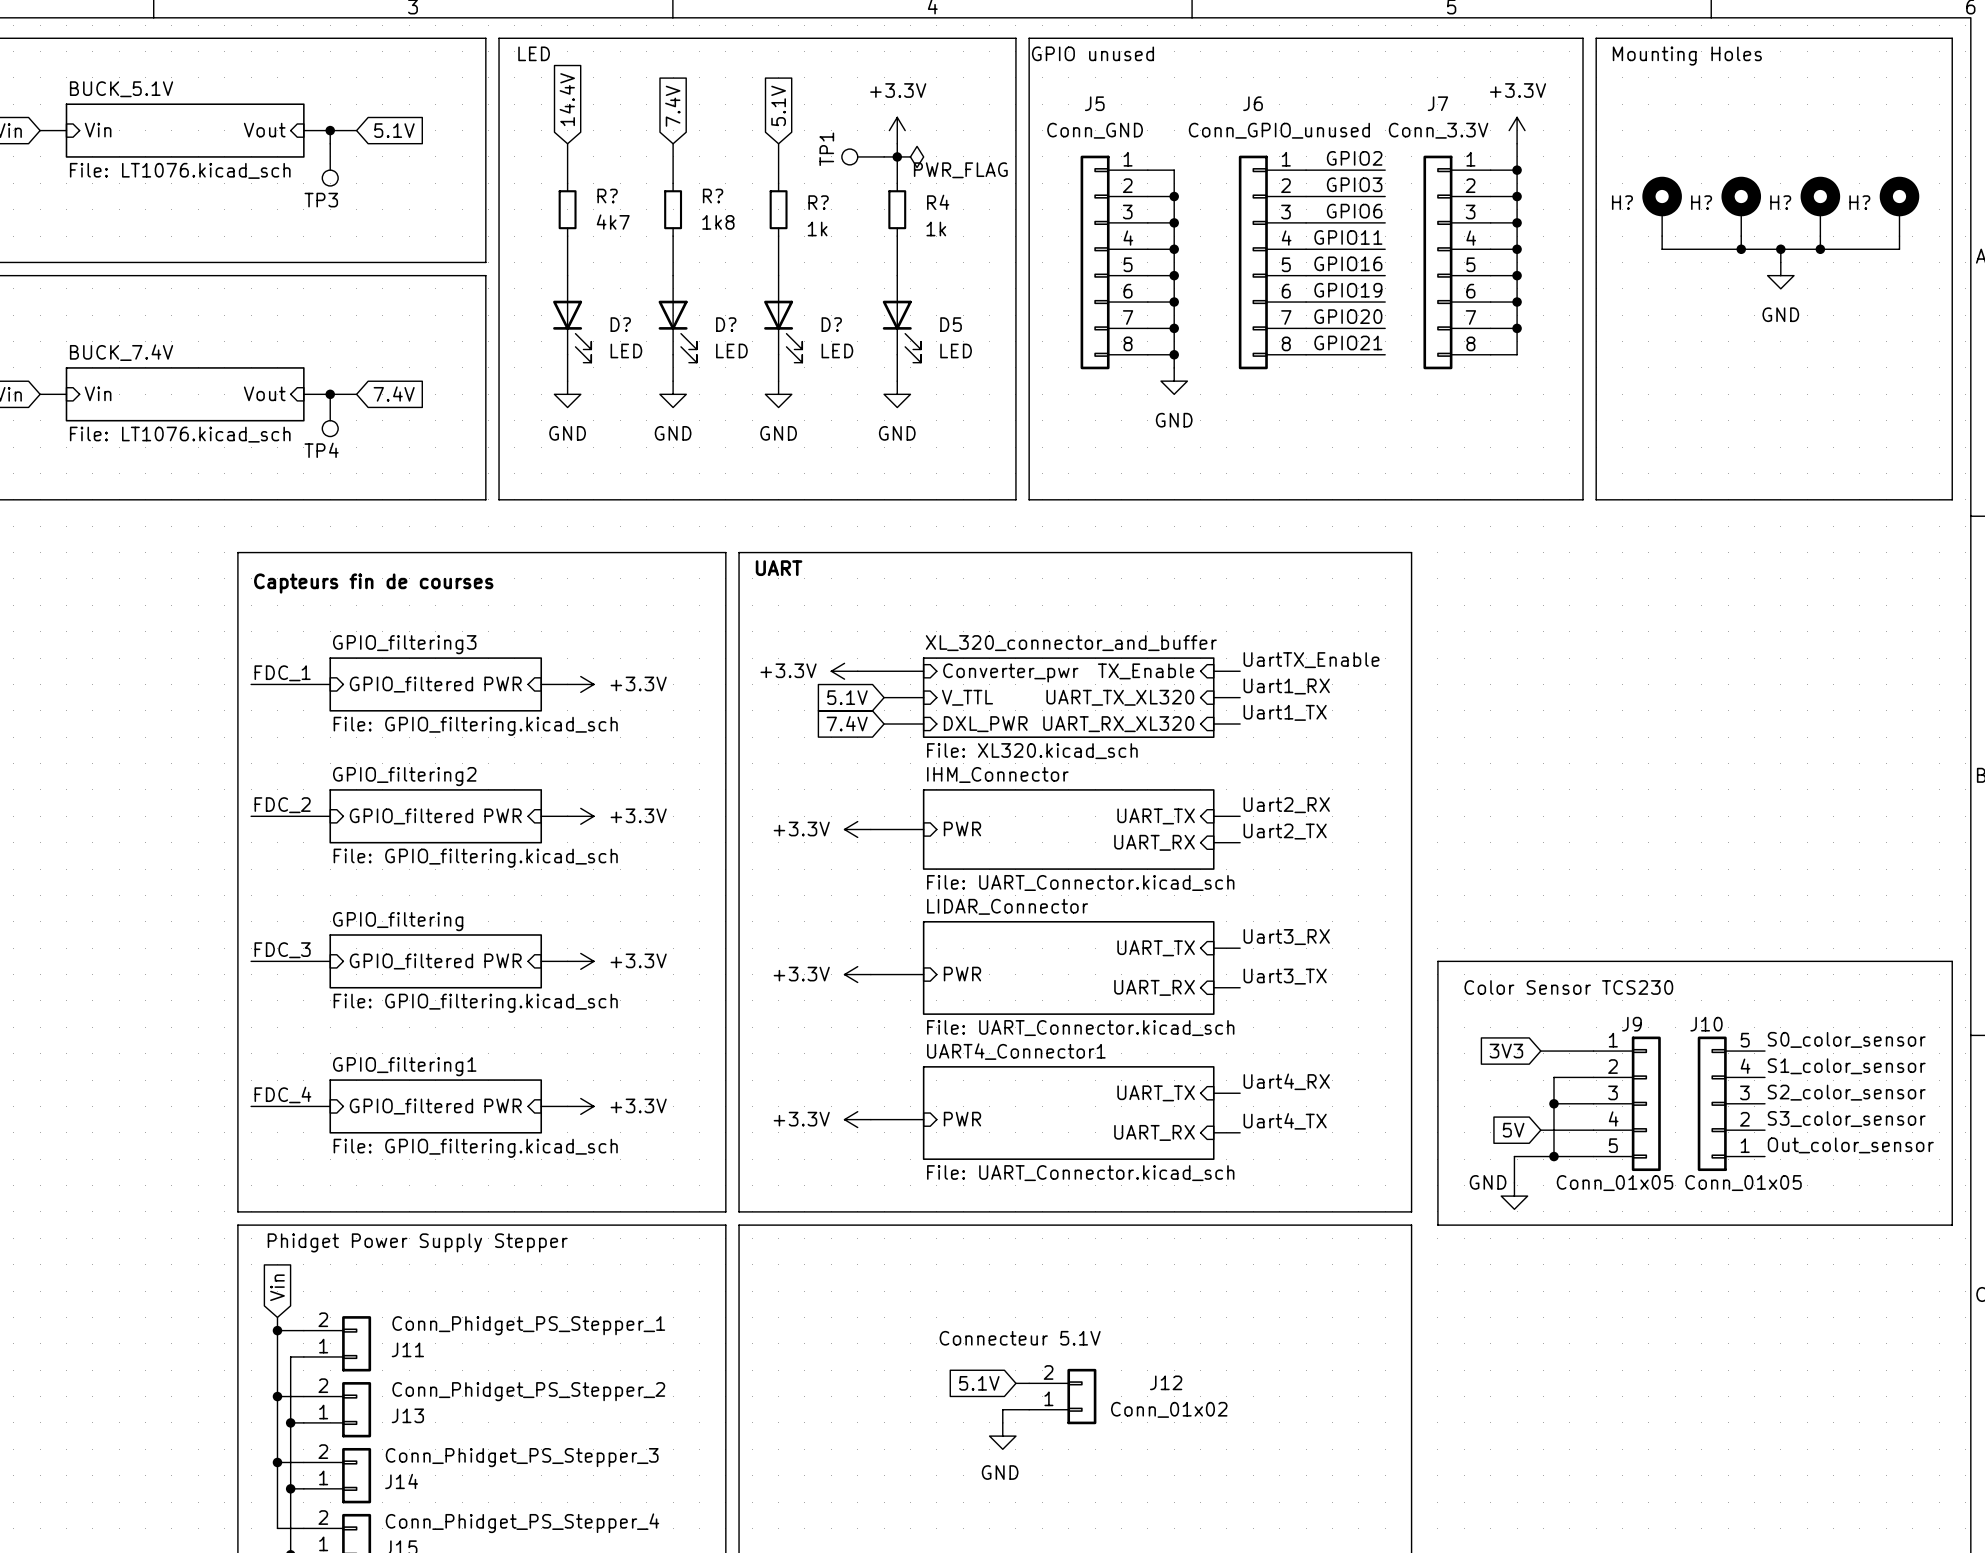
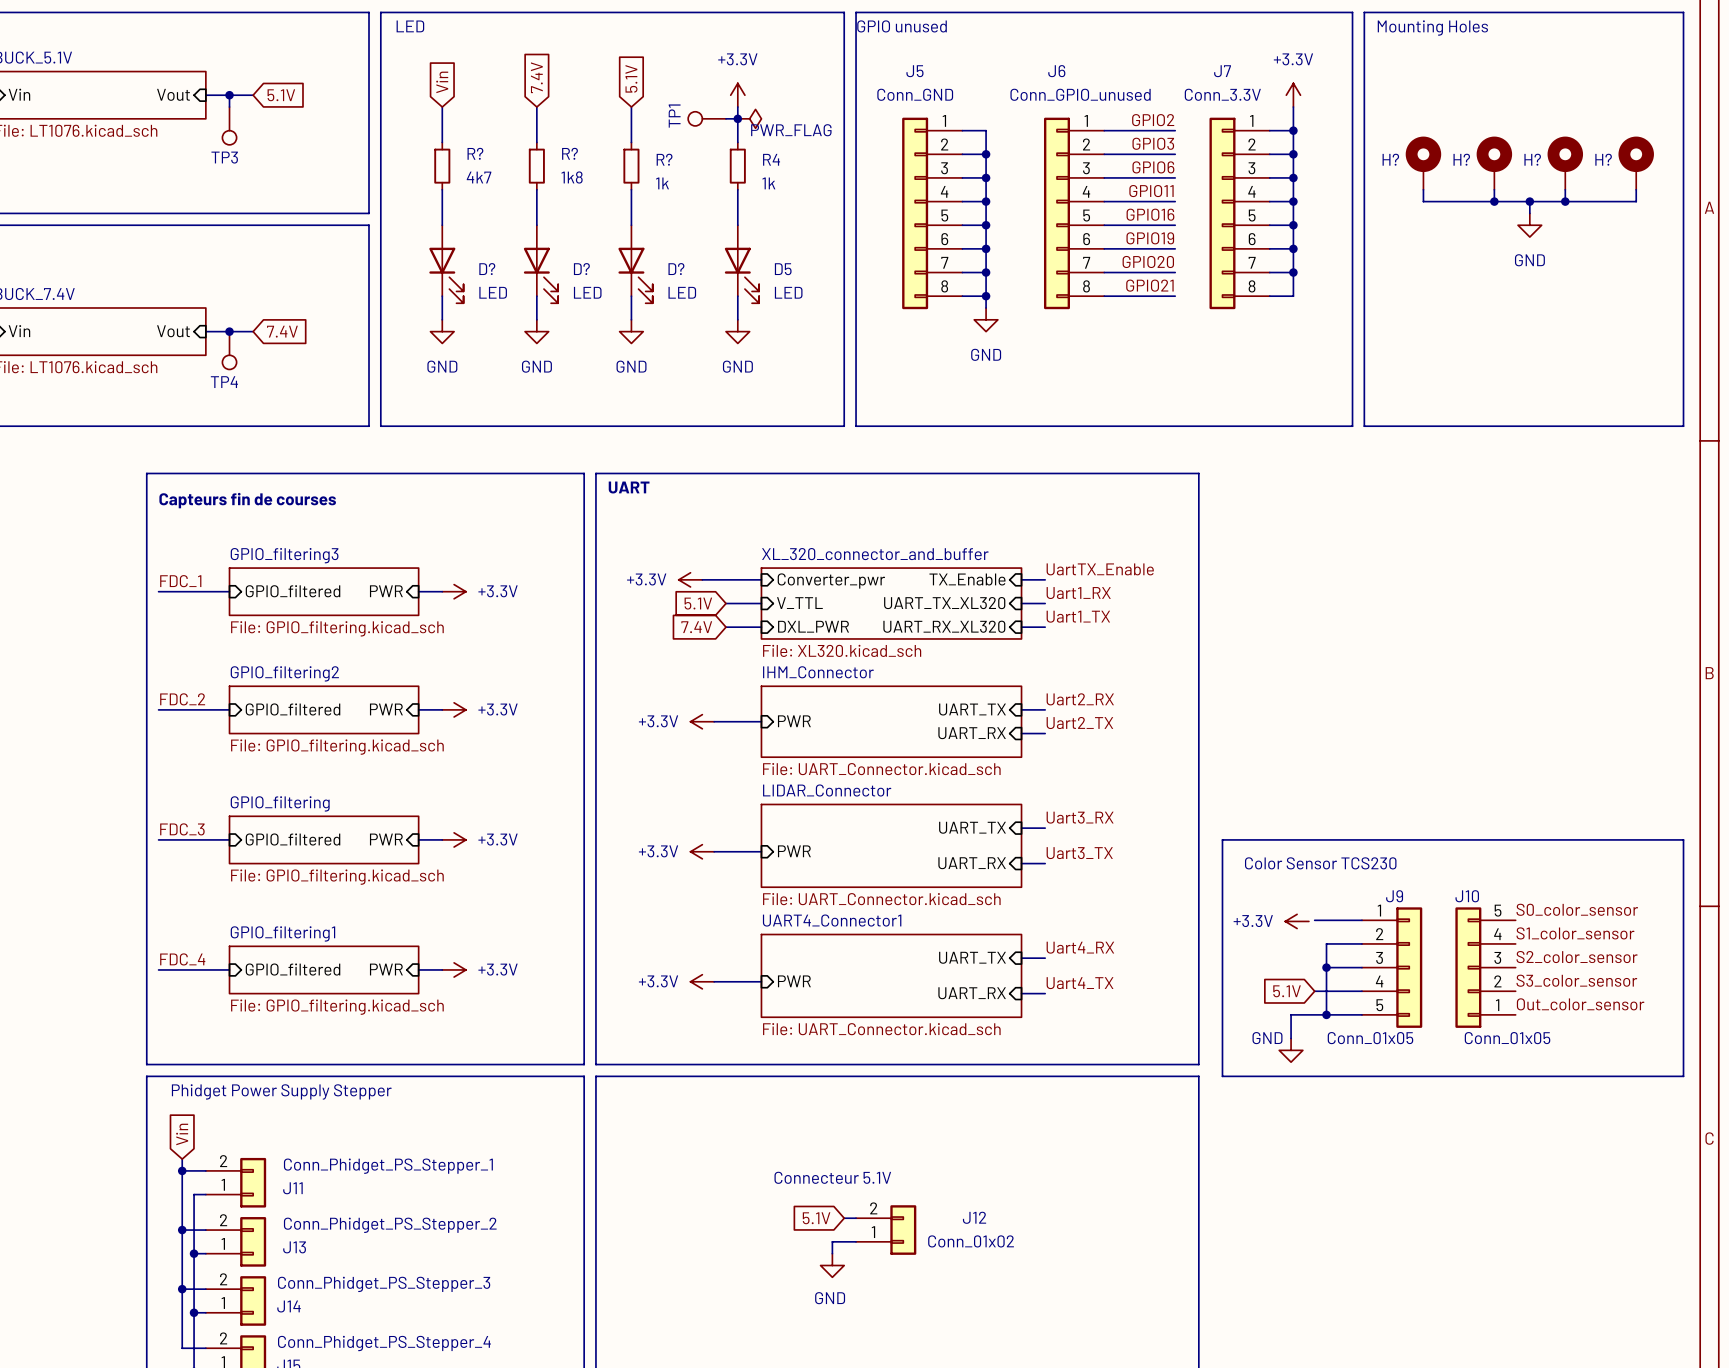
global label: 14.4V (567, 99) -> Vin (442, 82)
global label: 3V3 (1506, 1051) -> none
power symbol: none -> +3.3V (1297, 921)
global label: 5V (1513, 1130) -> 5.1V (1287, 991)

